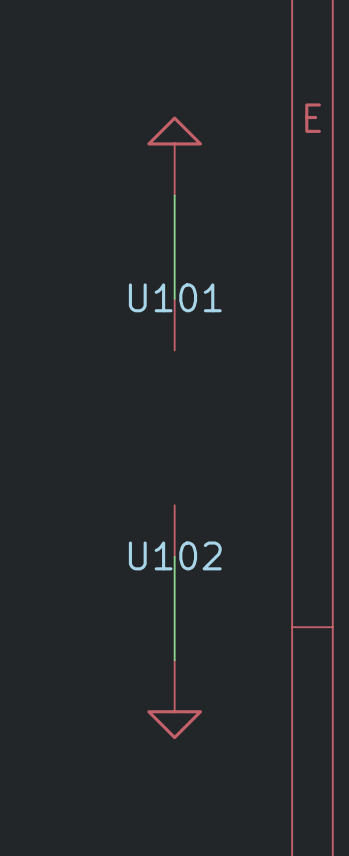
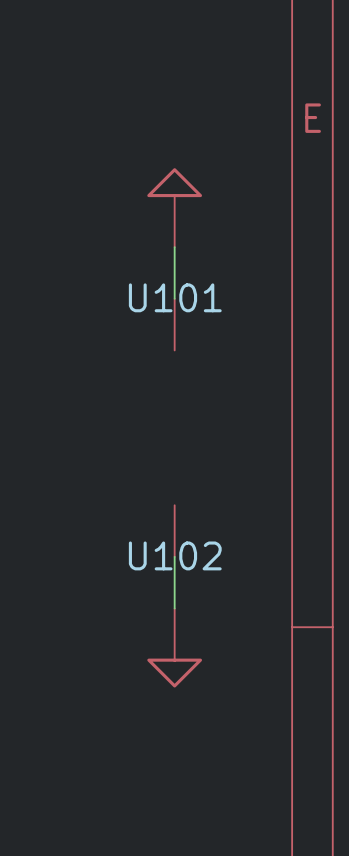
power symbol position: (174, 156) -> (174, 207)
power symbol position: (174, 699) -> (174, 648)

